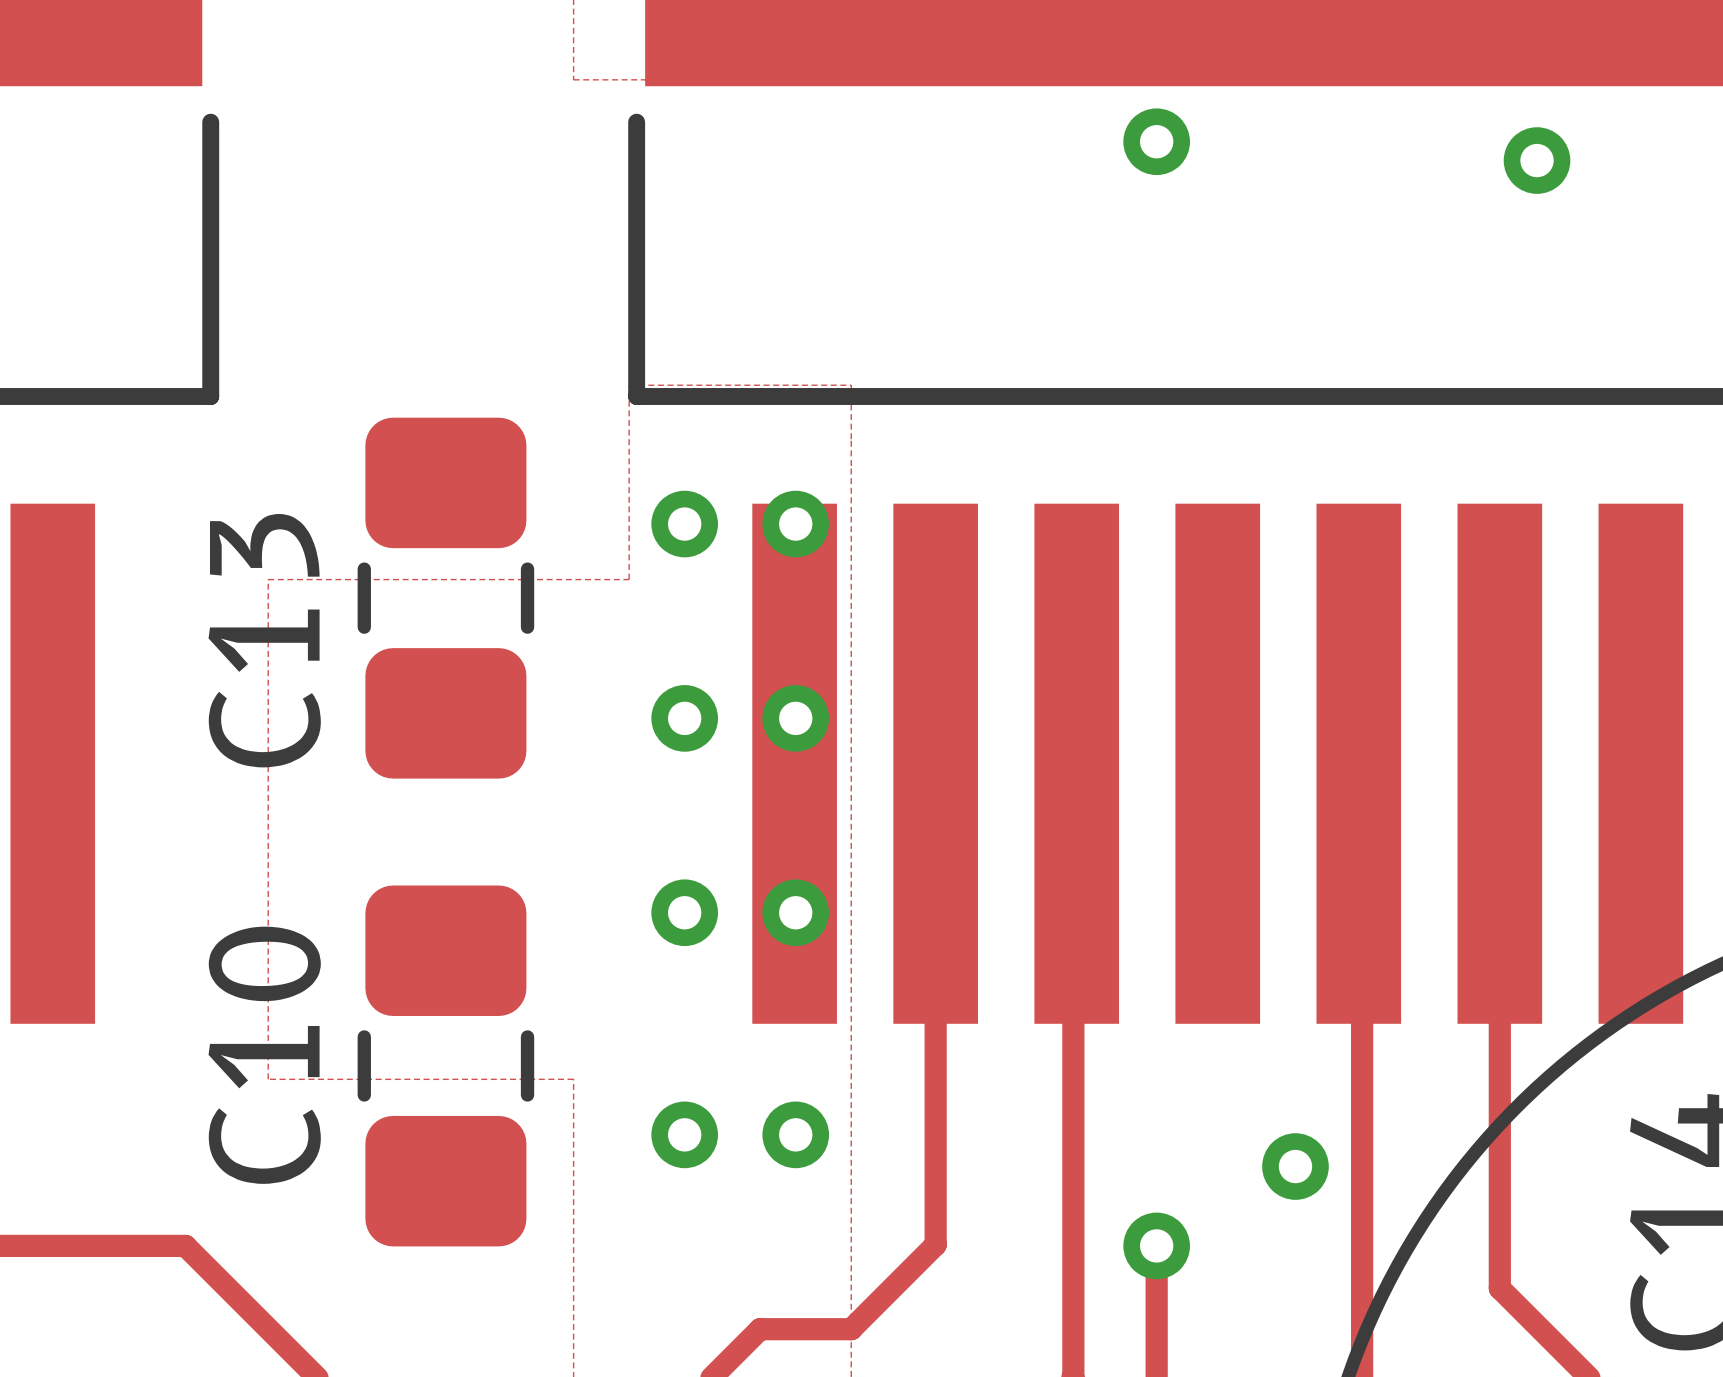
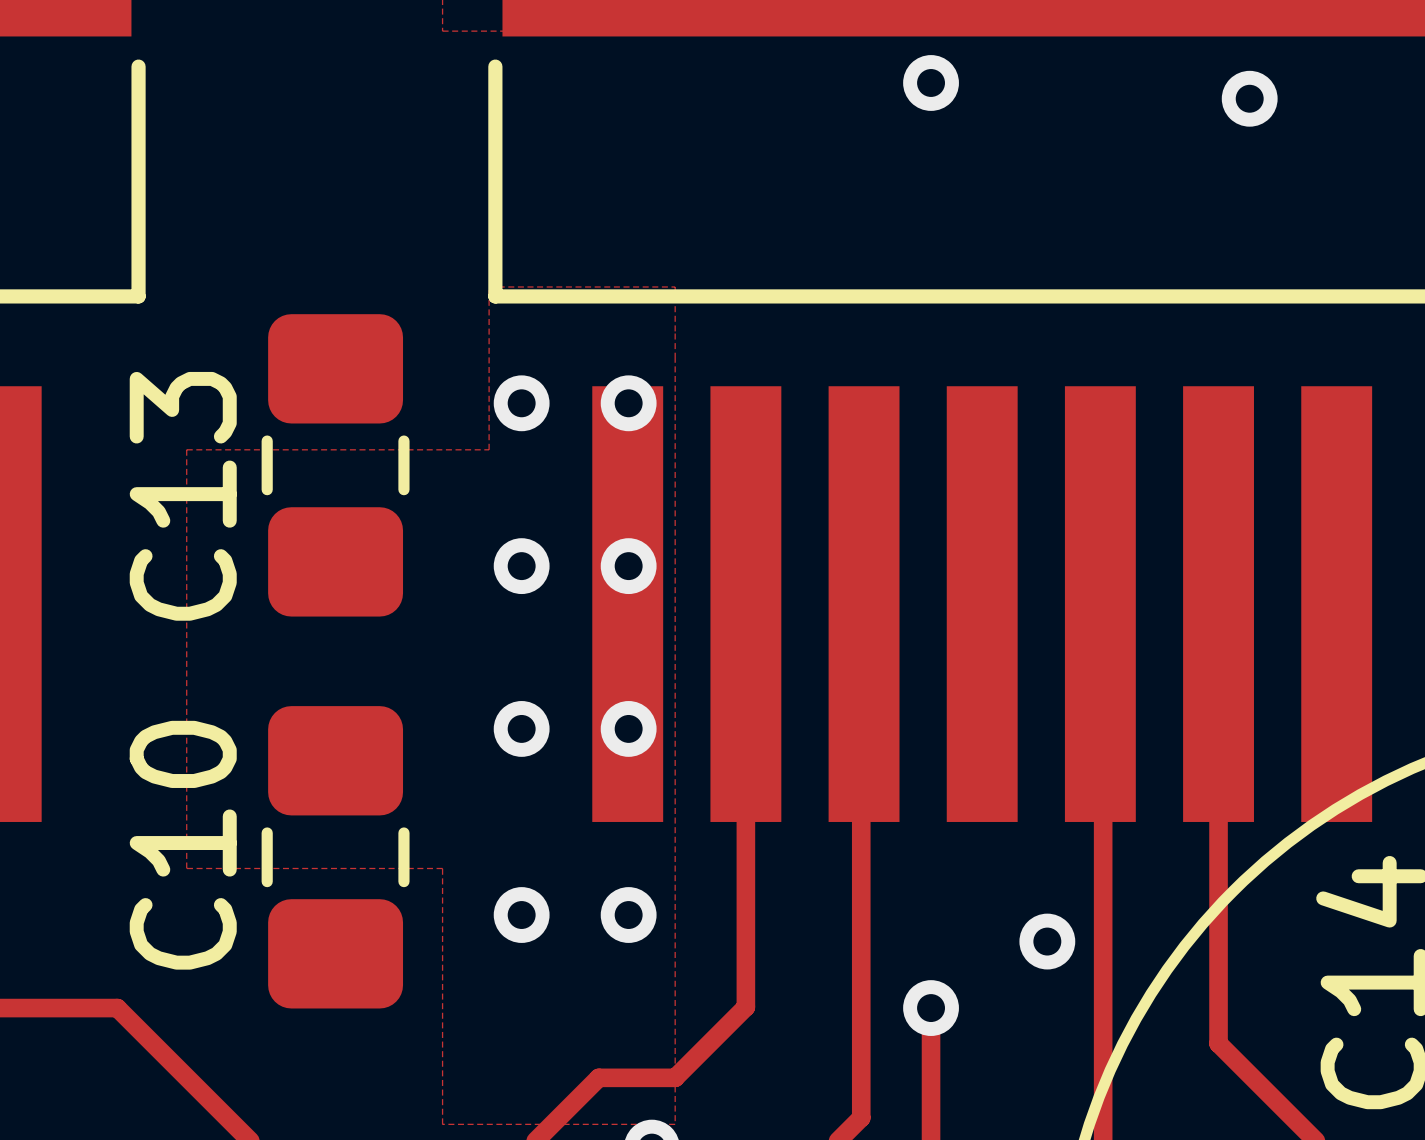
via position: (684, 524) -> (521, 403)
via position: (684, 718) -> (521, 566)
via position: (684, 912) -> (521, 728)
via position: (684, 1134) -> (521, 915)

